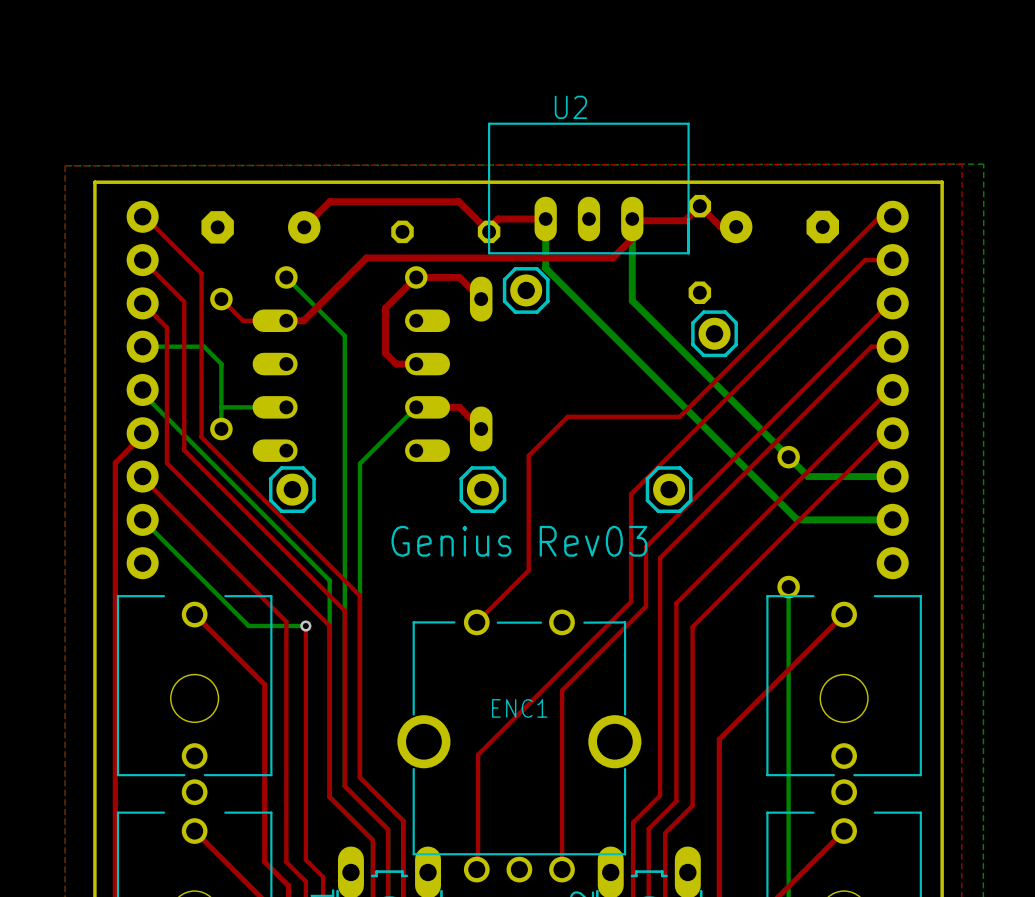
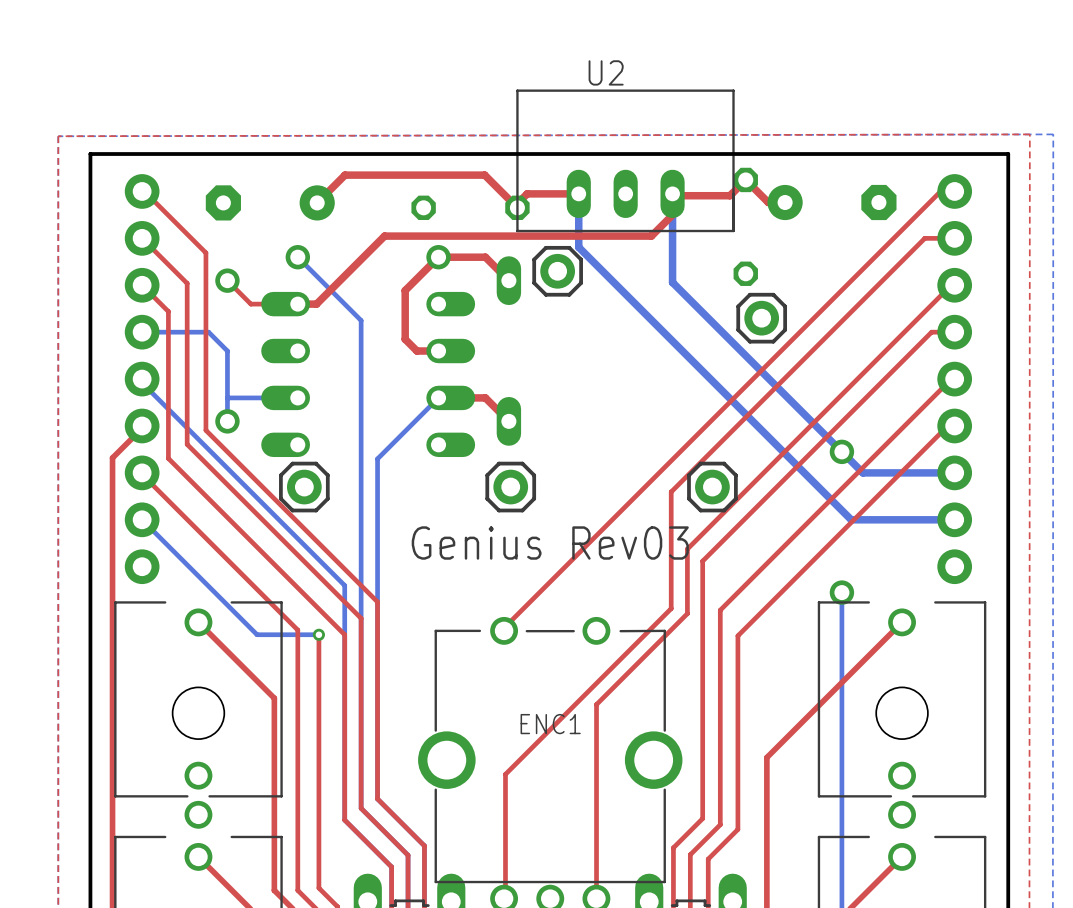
top track: (679, 416) (567, 416) (528, 455) (528, 570) (476, 622) -> (723, 408) (504, 627) (504, 630)

